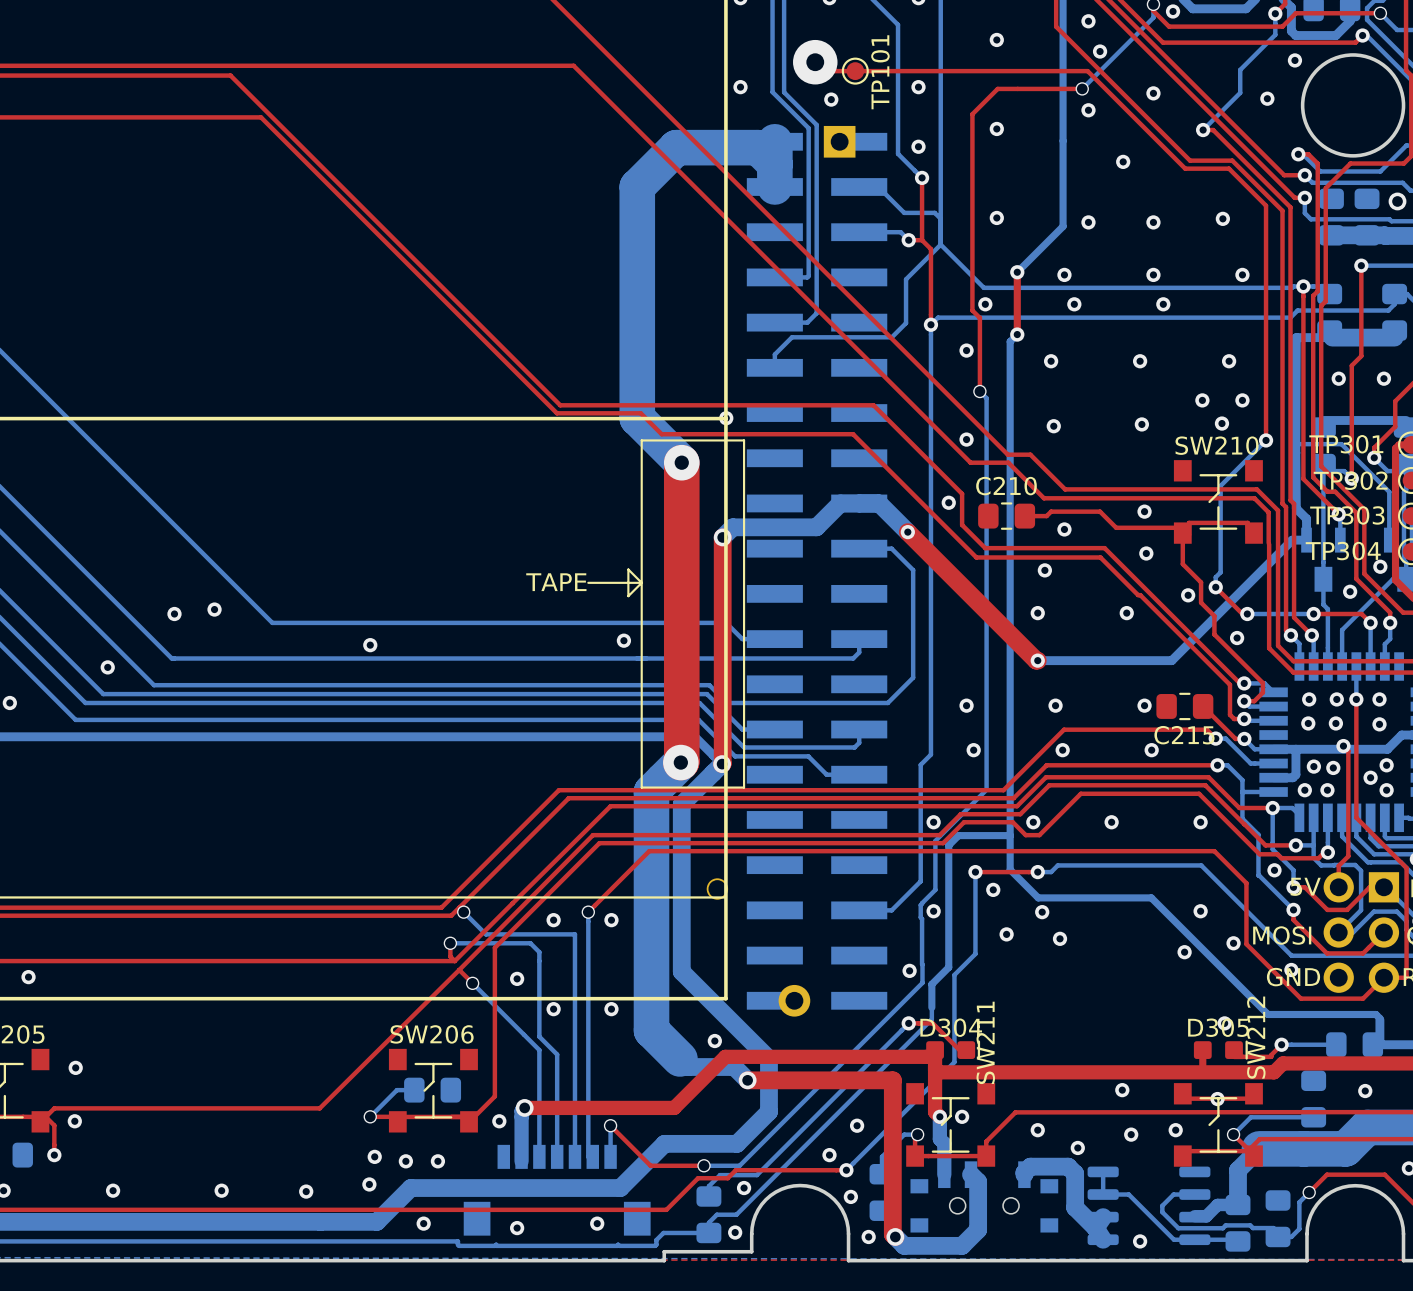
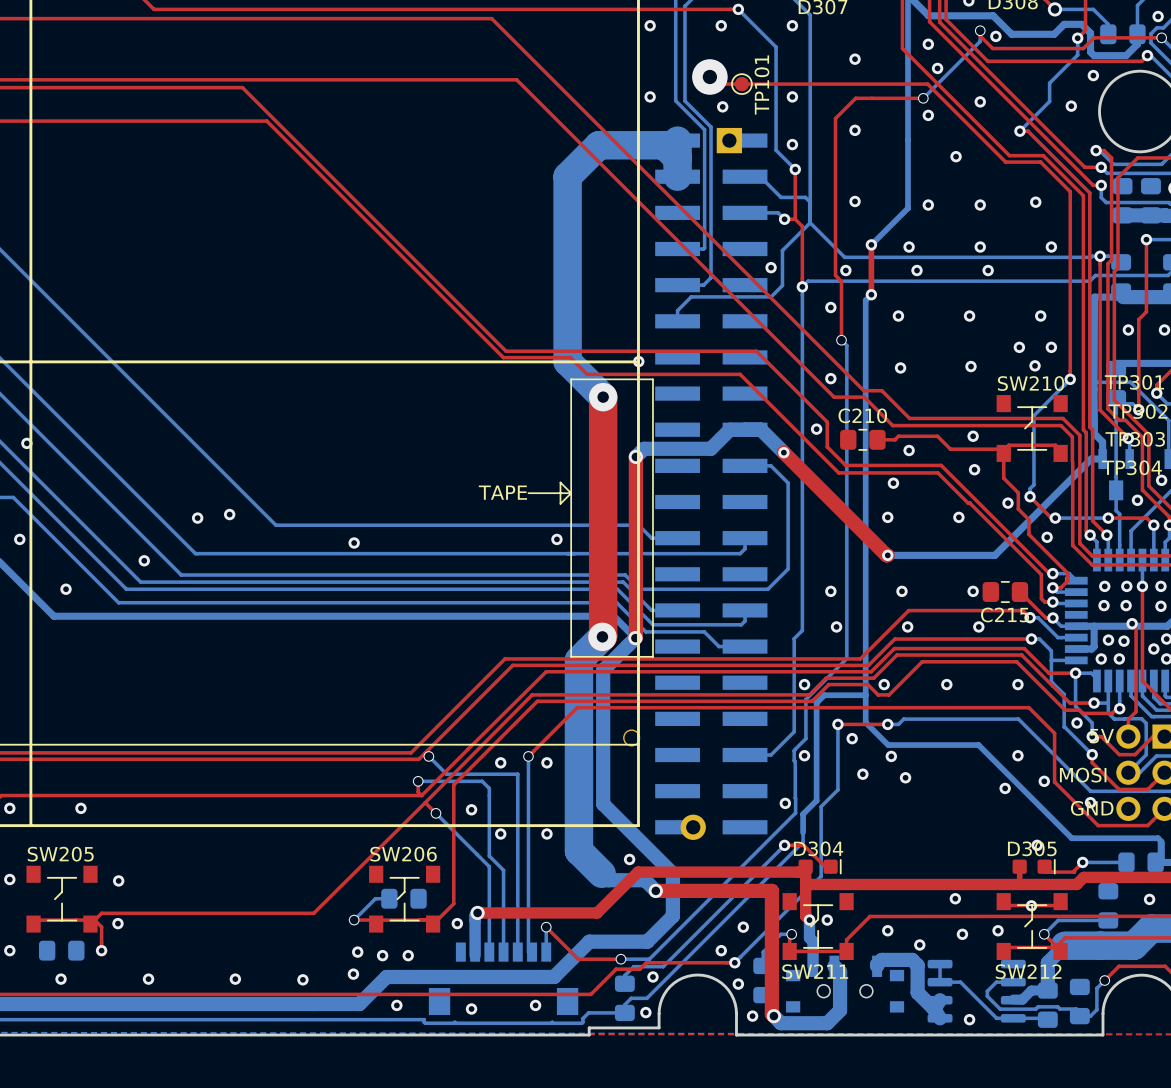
via: none -> (771, 267)
SW212 name rotation: 0° (1256, 1037) -> 90° clockwise (1028, 971)
SW212 name position: SW212 (1256, 1037) -> SW212 (1028, 971)
SW211 name rotation: 0° (985, 1042) -> 90° clockwise (815, 971)
SW211 name position: SW211 (985, 1042) -> SW211 (815, 971)

